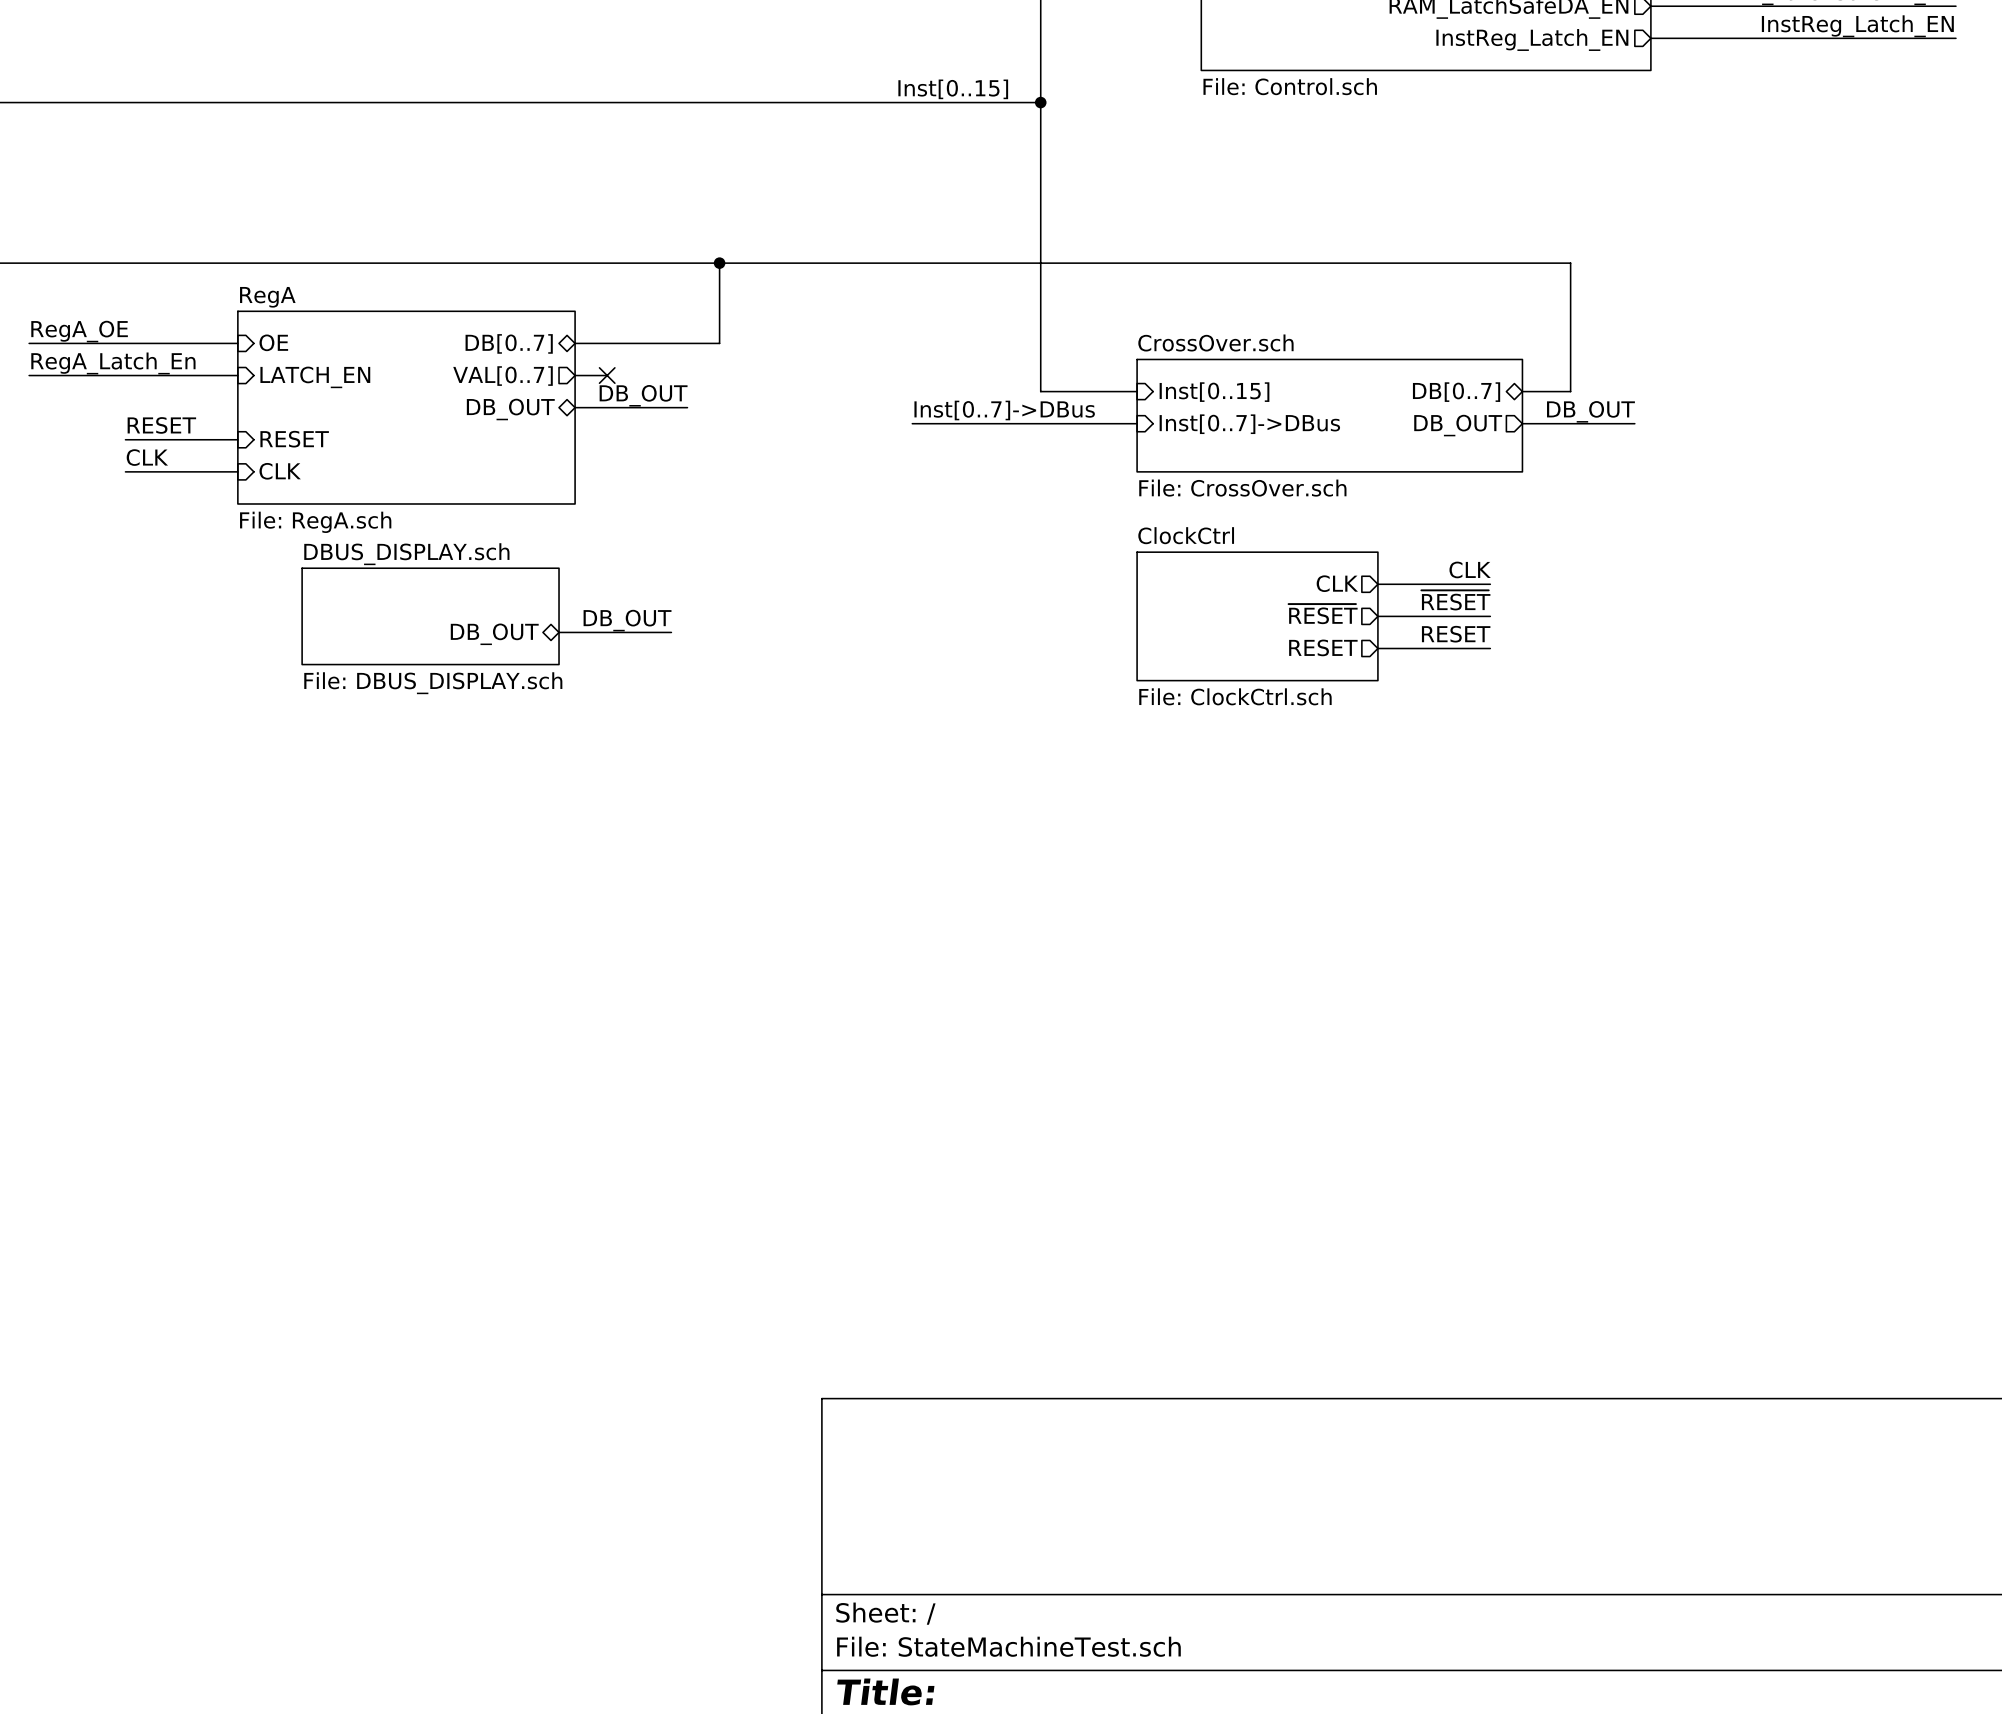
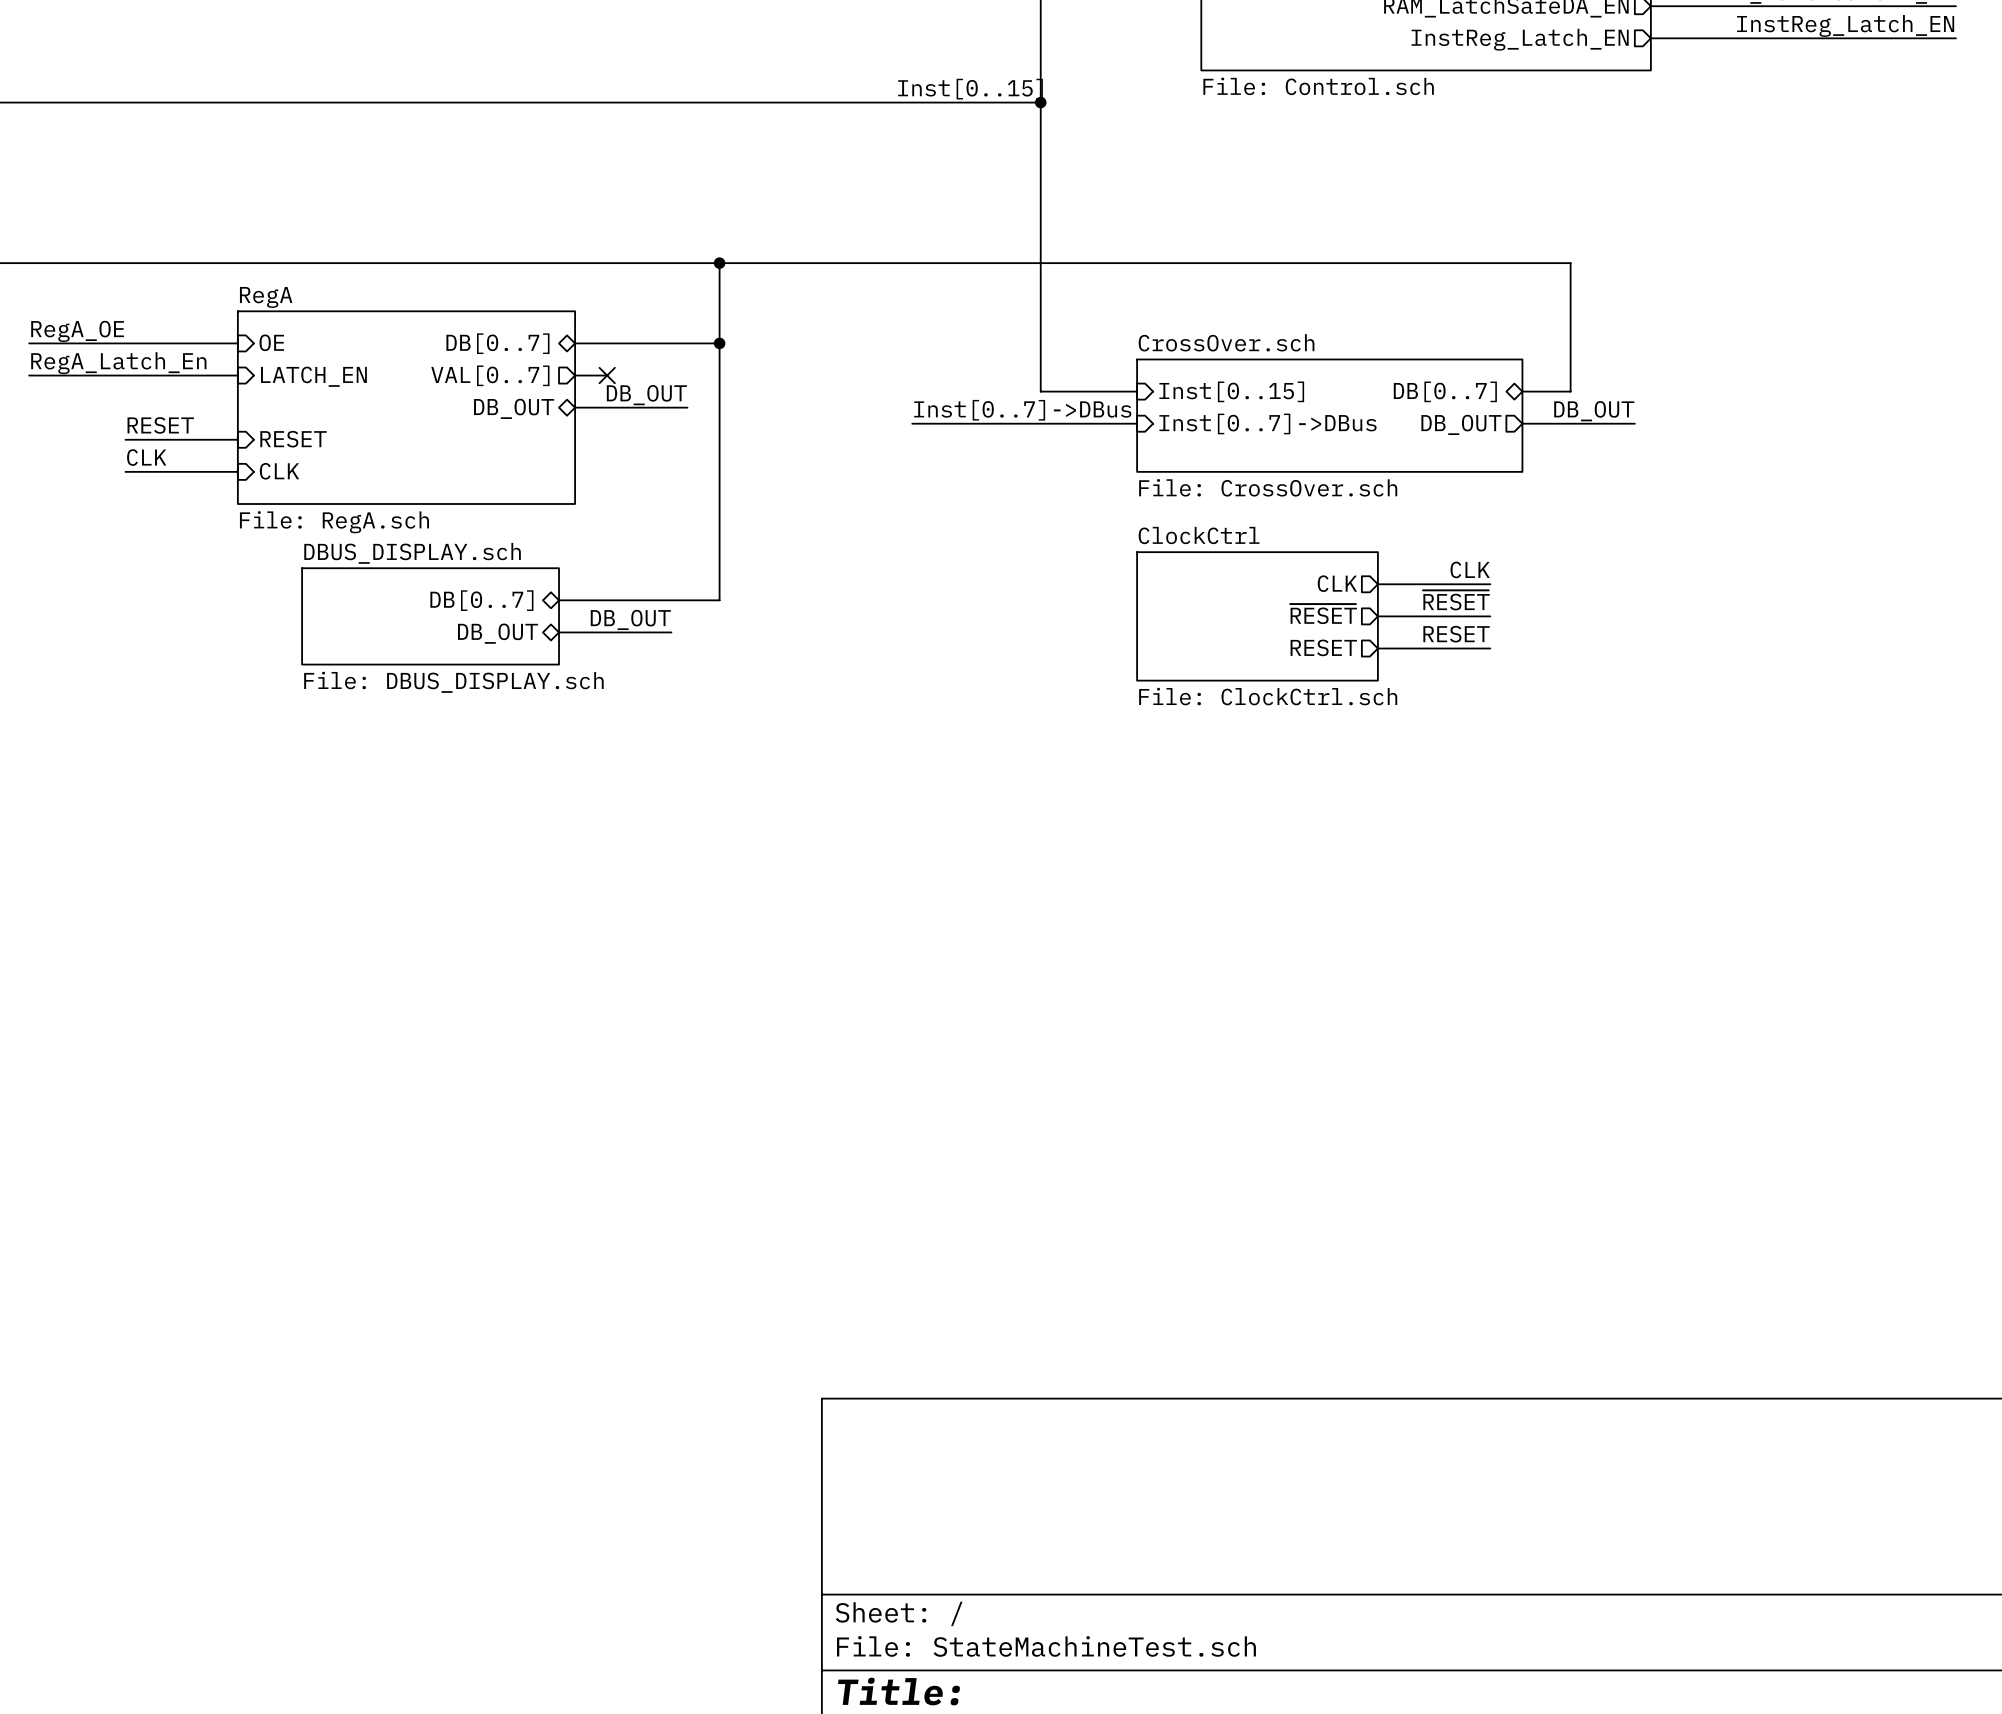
bus: none -> (719, 343) (719, 600) (559, 600)
junction: none -> (719, 343)
sheet pin: none -> DB[0..7] (481, 600)

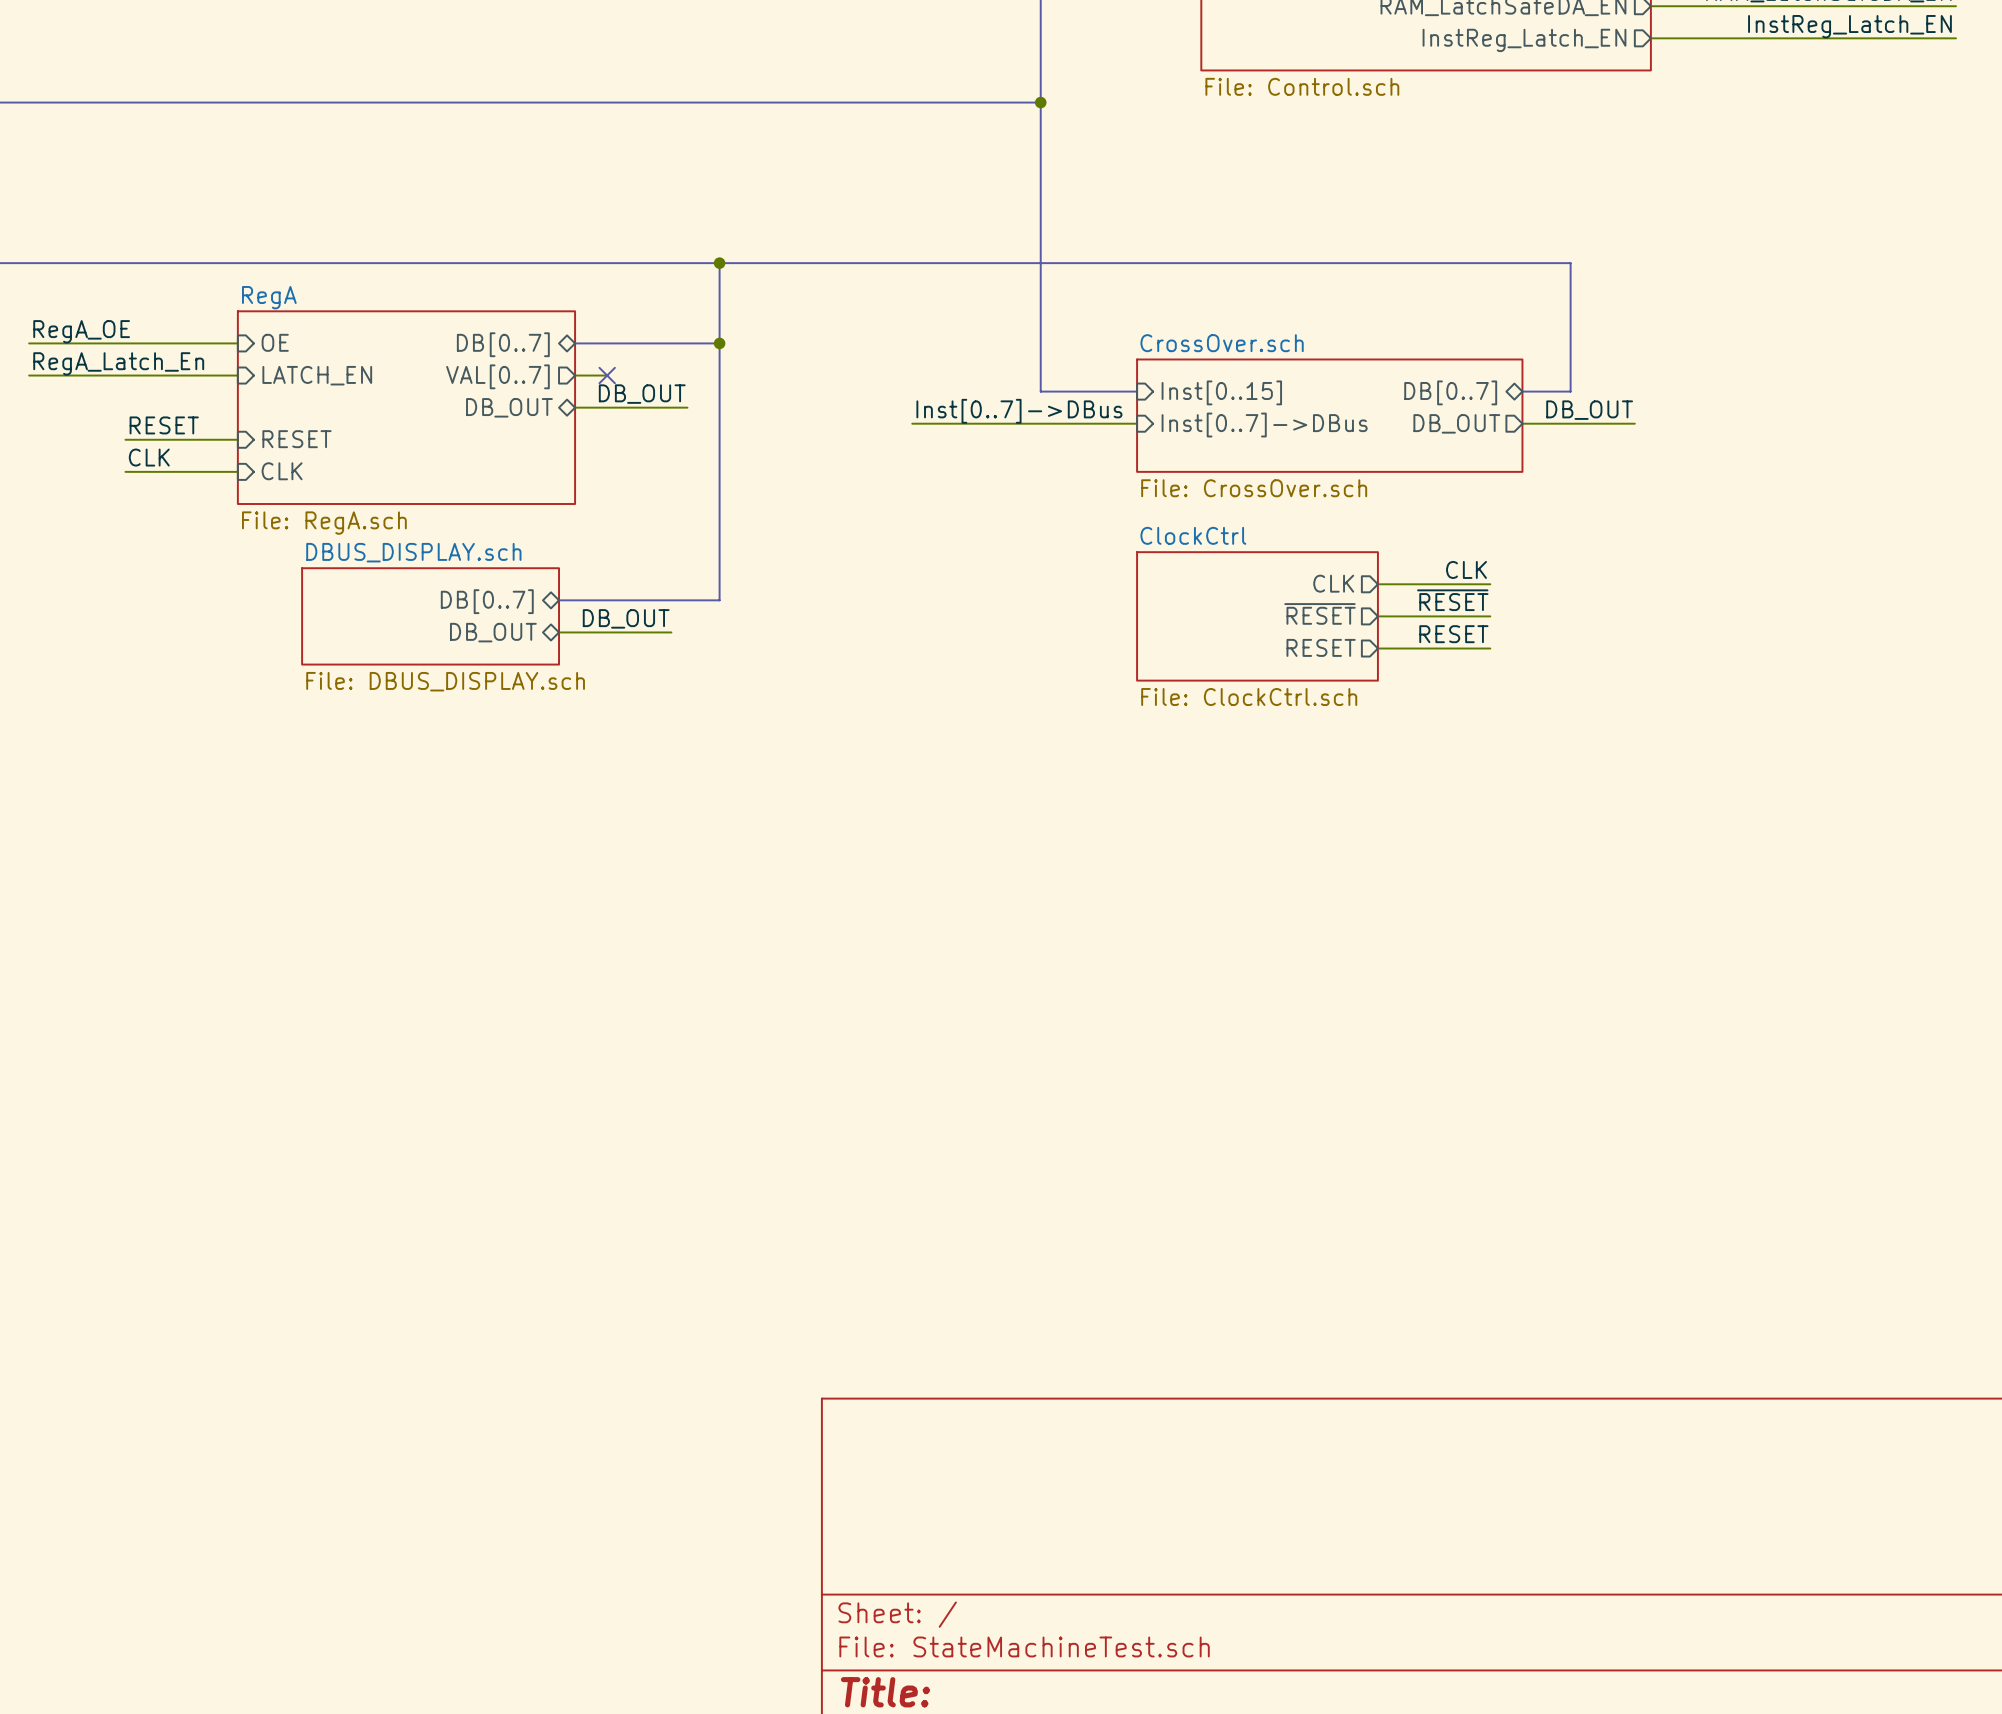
label: Inst[0..15] (970, 89) -> none

